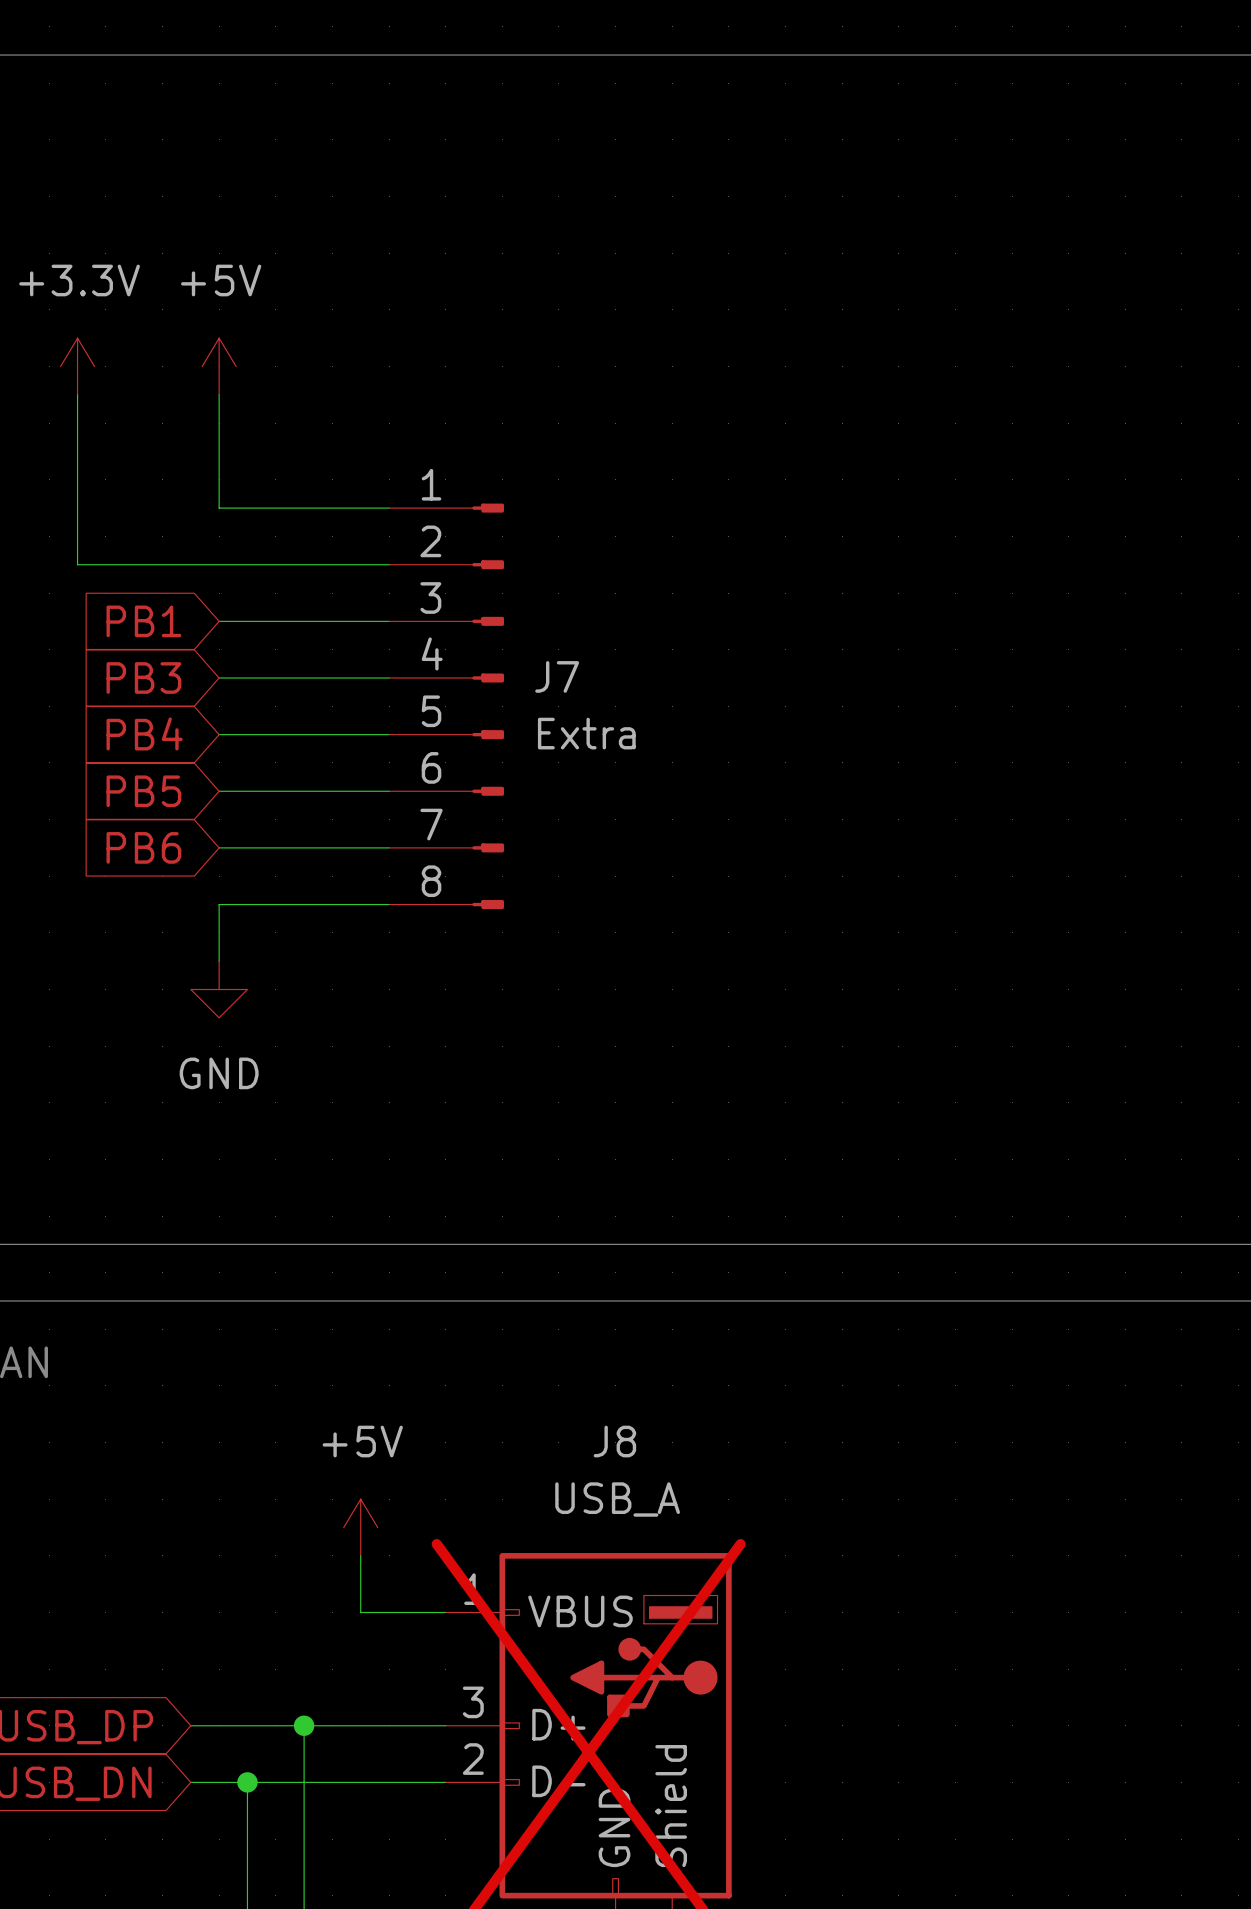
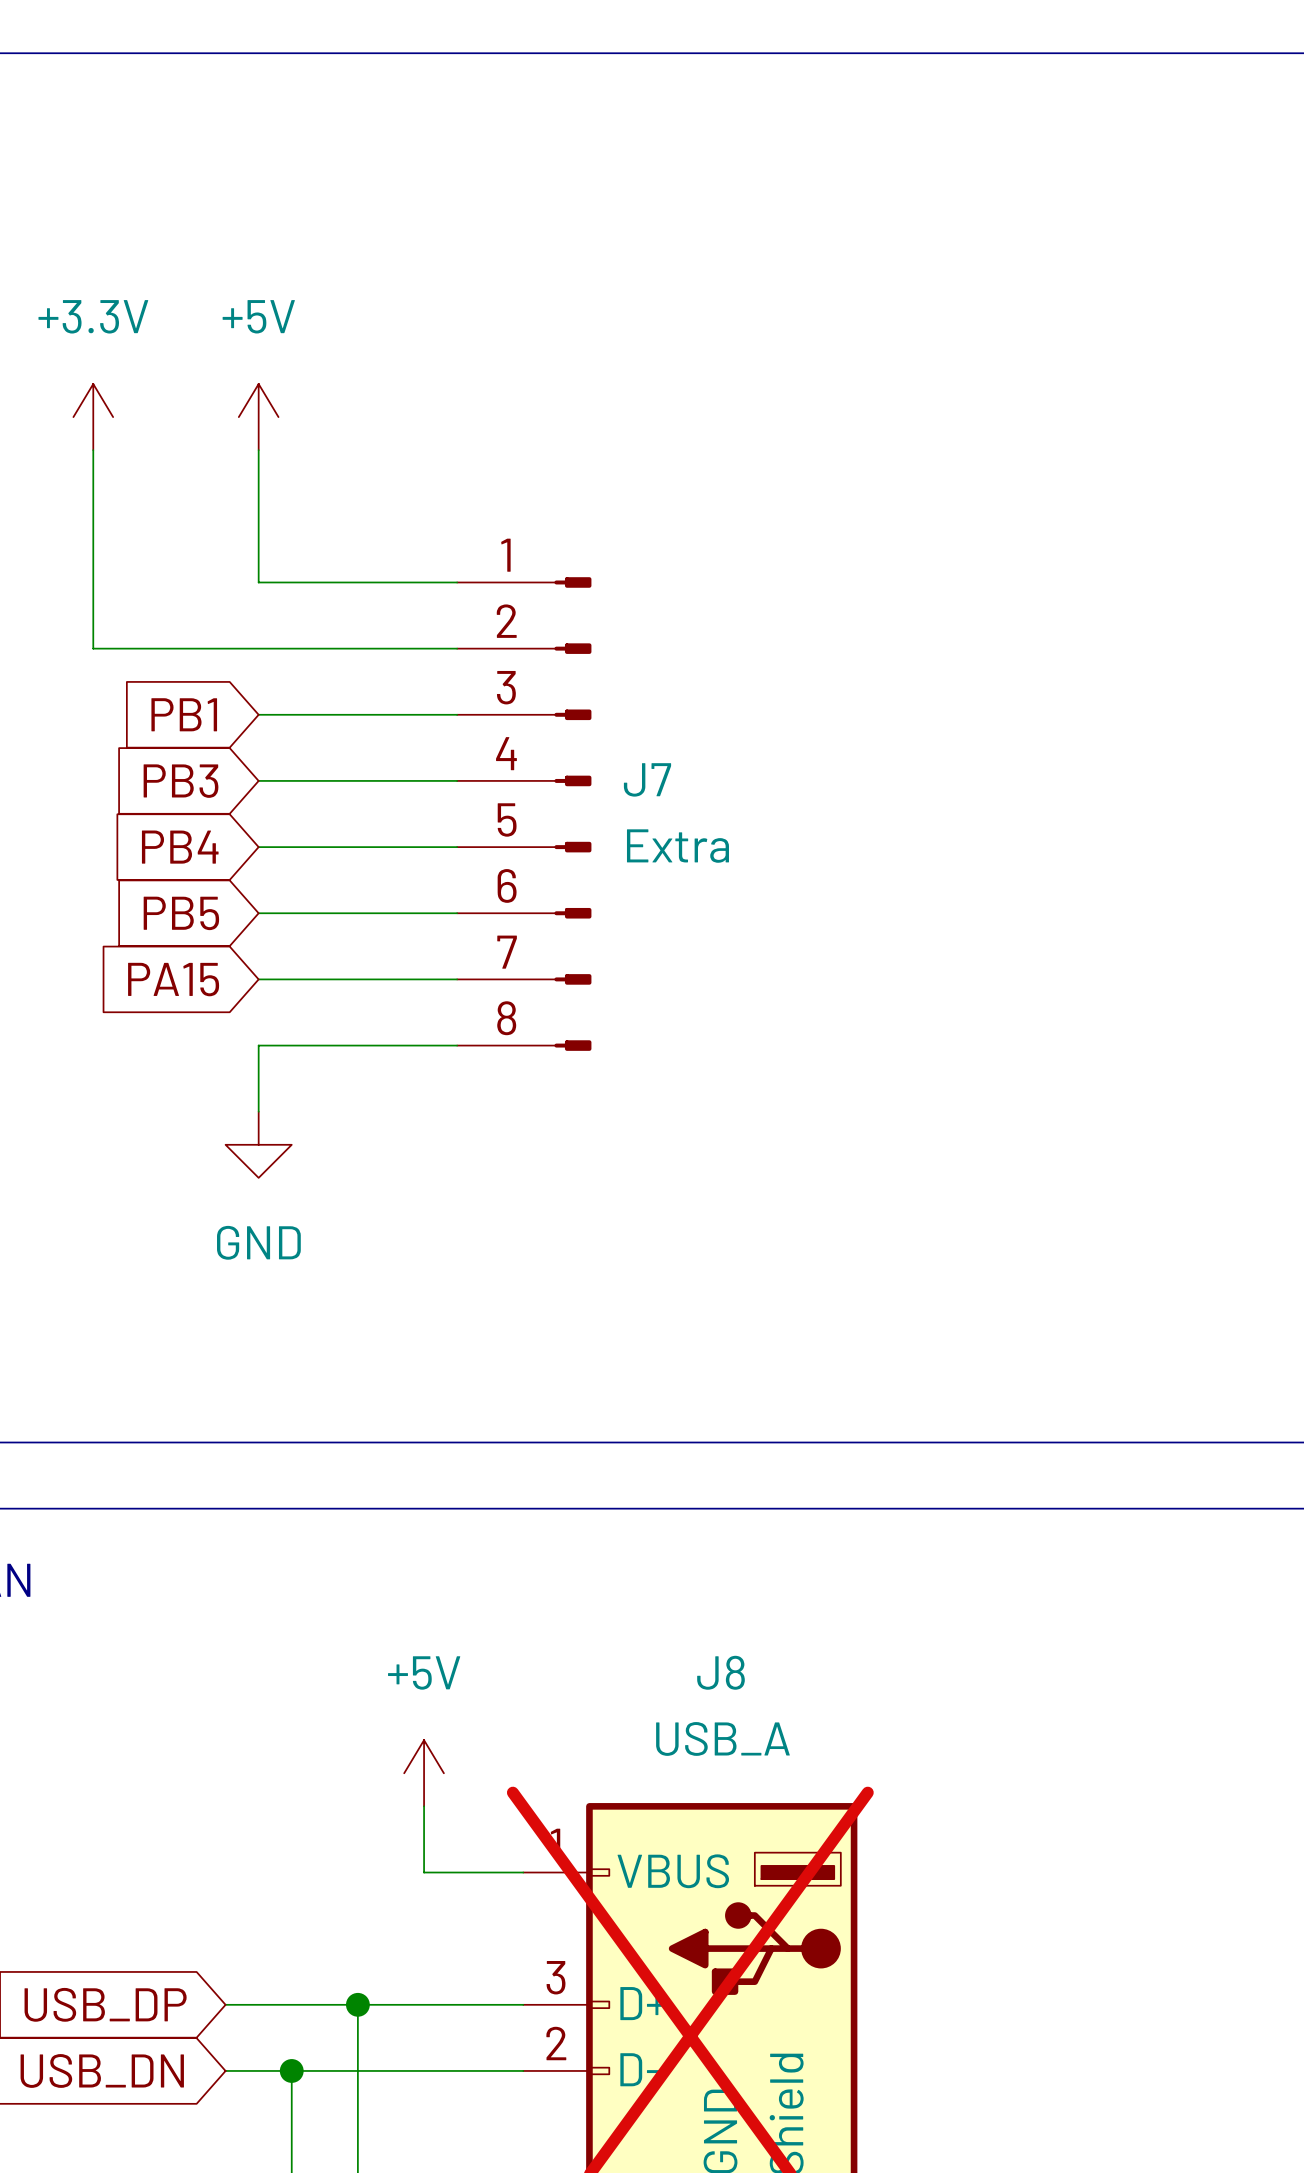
global label: PB6 (143, 847) -> PA15 (173, 979)

